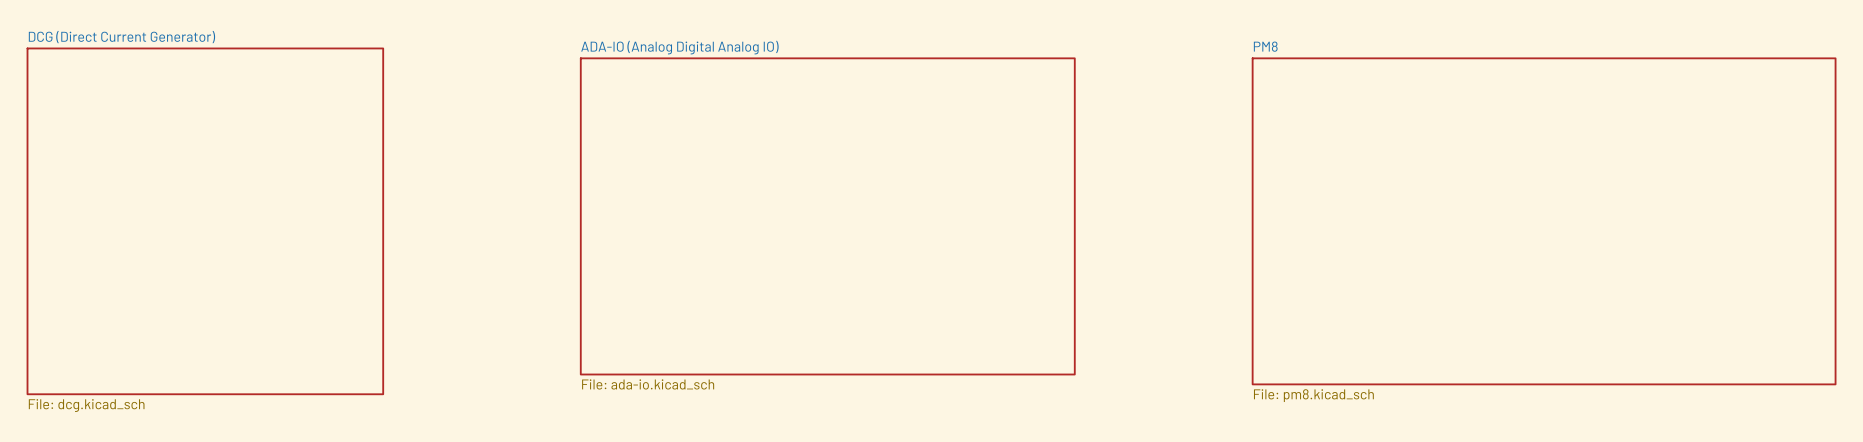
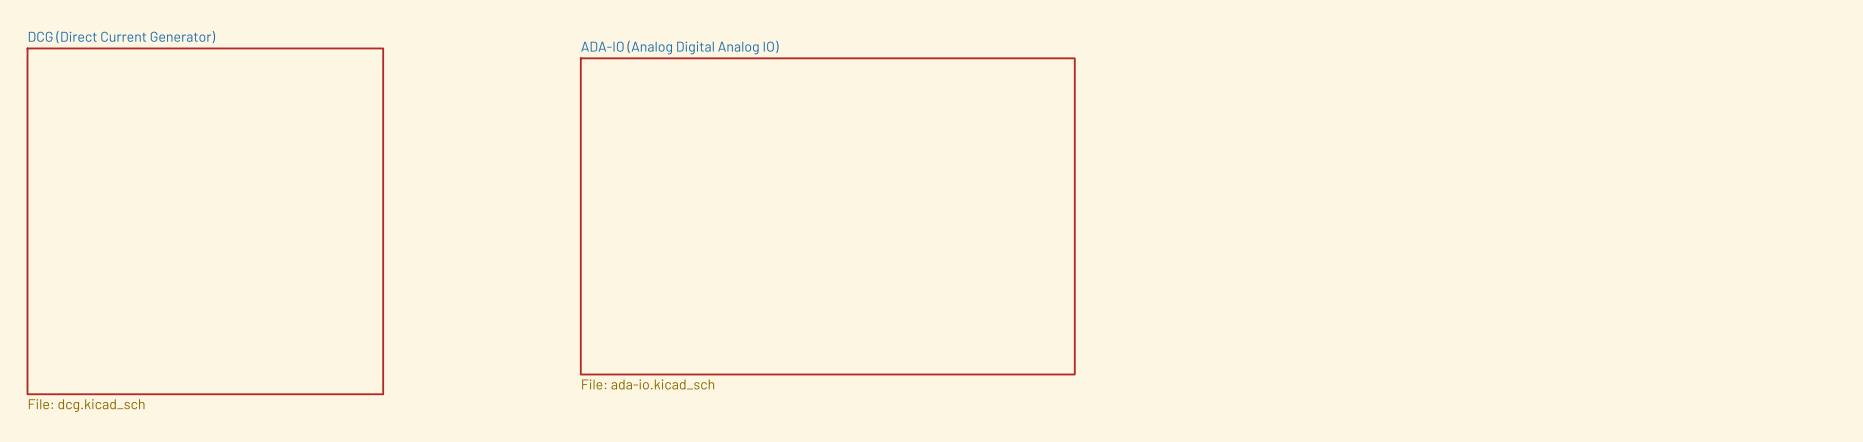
sheet PM8: File: pm8.kicad_sch (1544, 221) -> none

